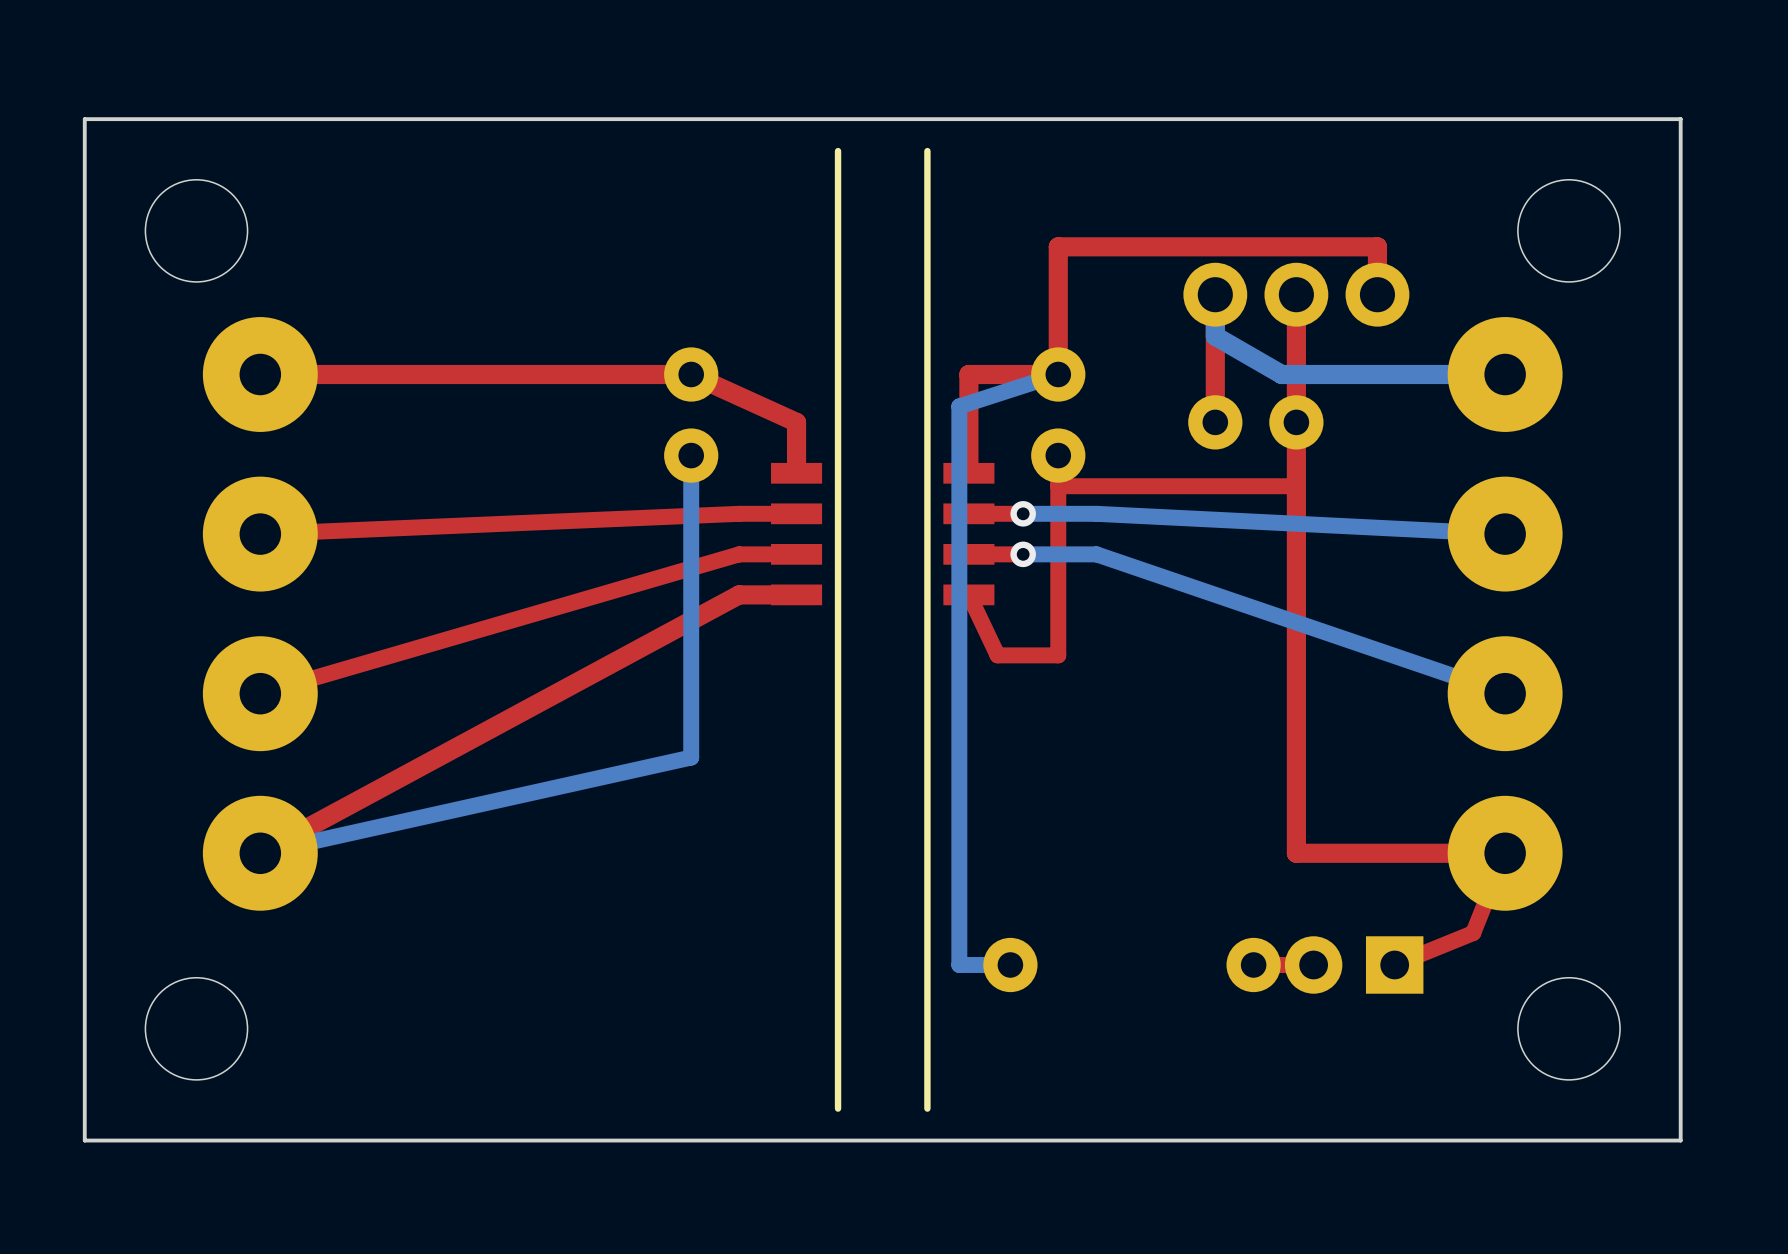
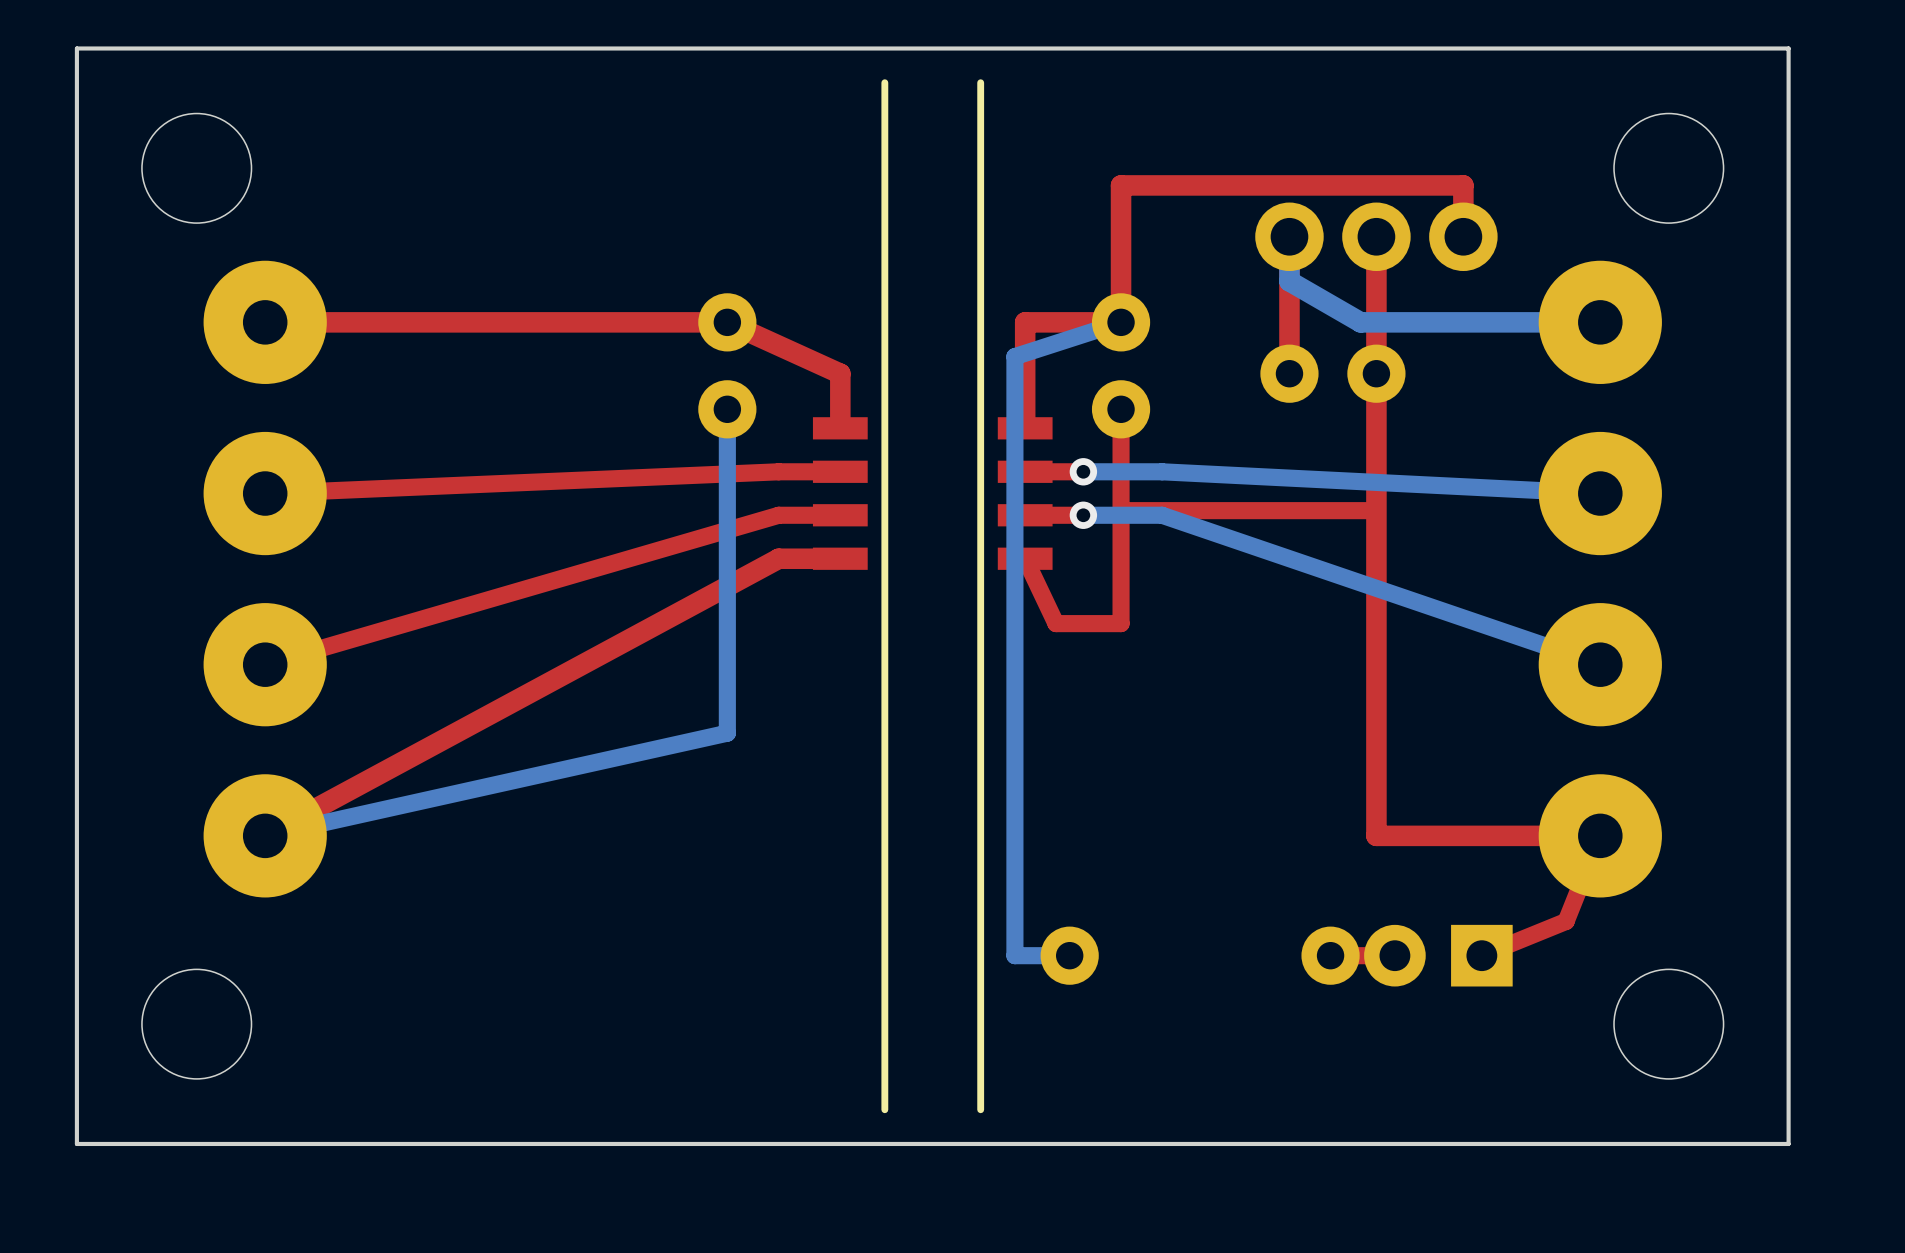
top track: (1296, 486) (1058, 486) -> (1376, 510) (1121, 510)

